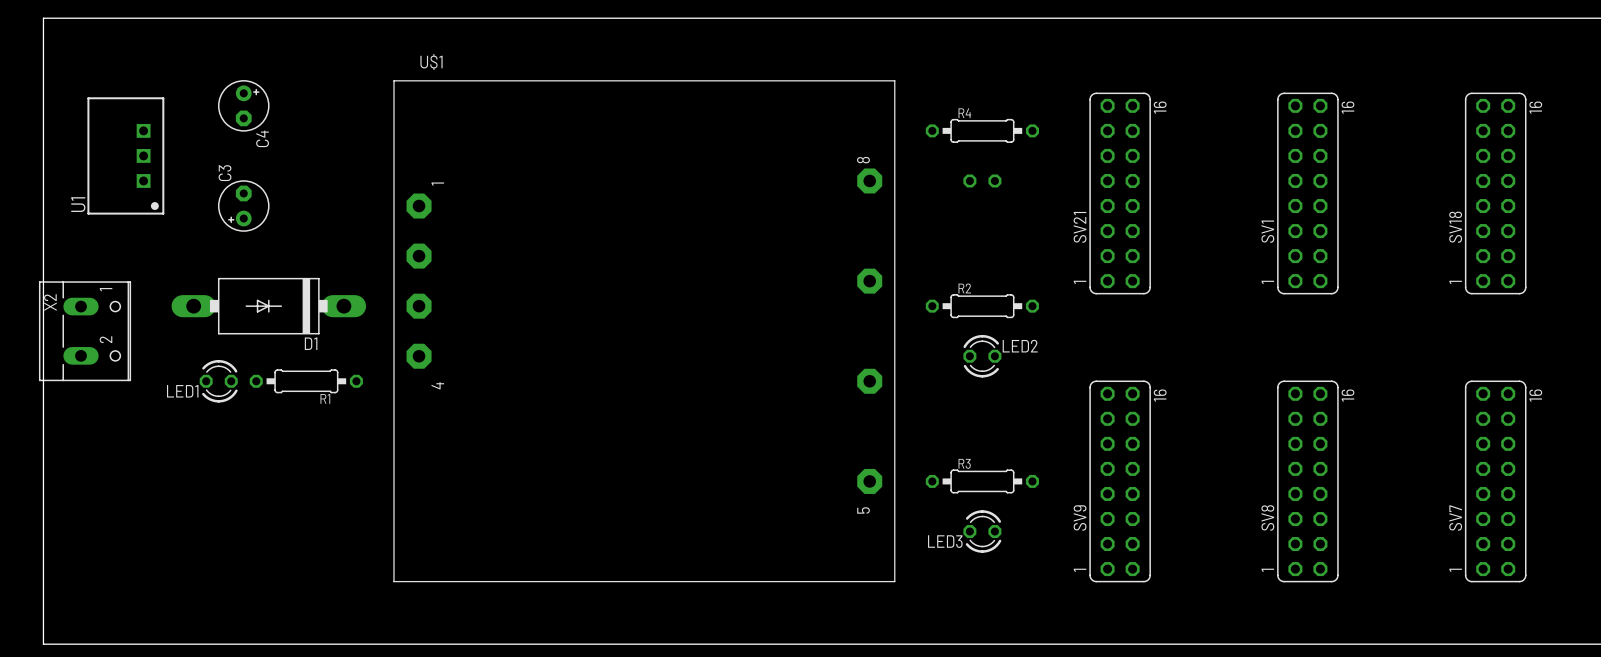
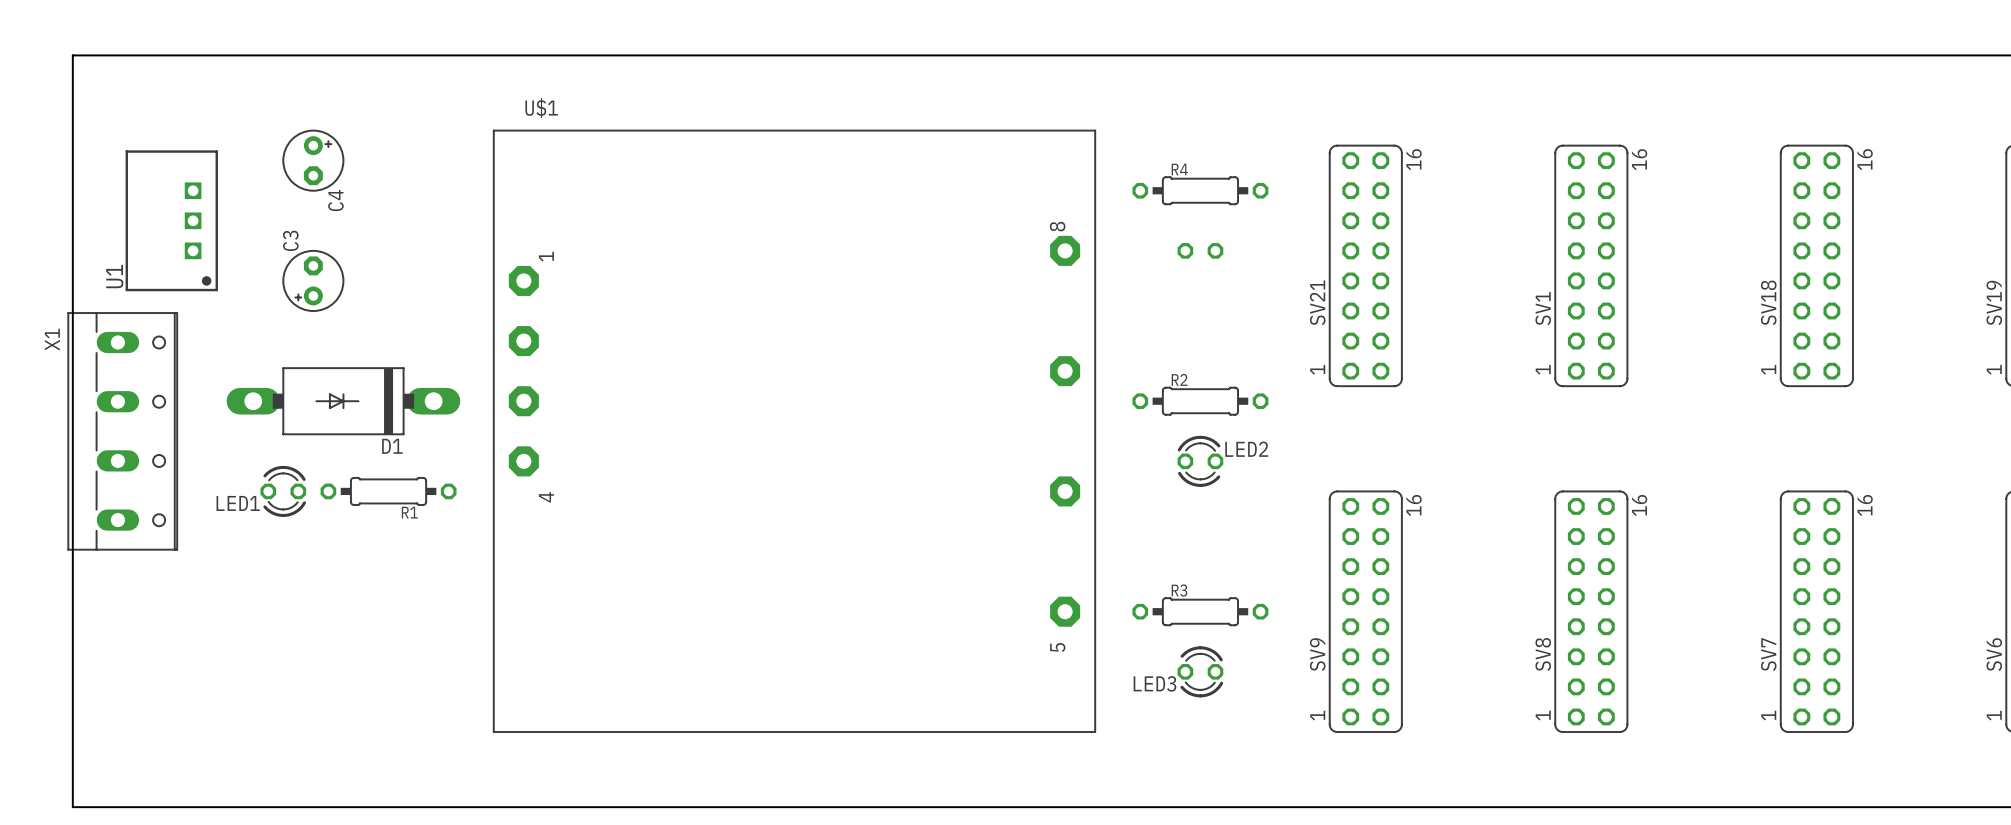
X2: (85, 331) -> none
X1: none -> (122, 431)

